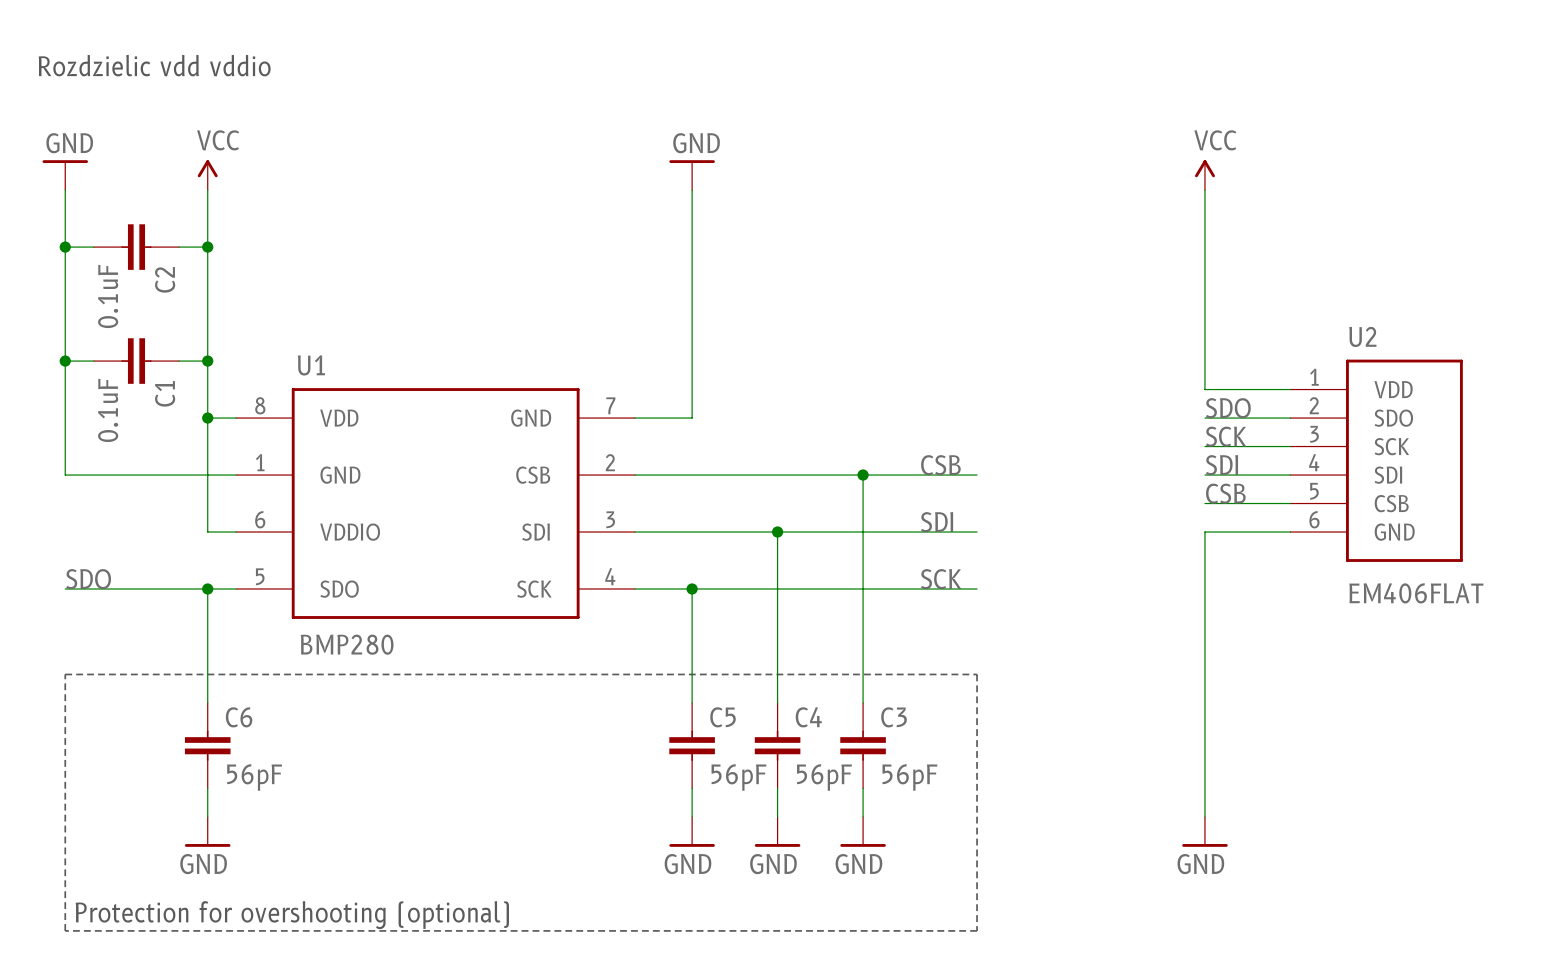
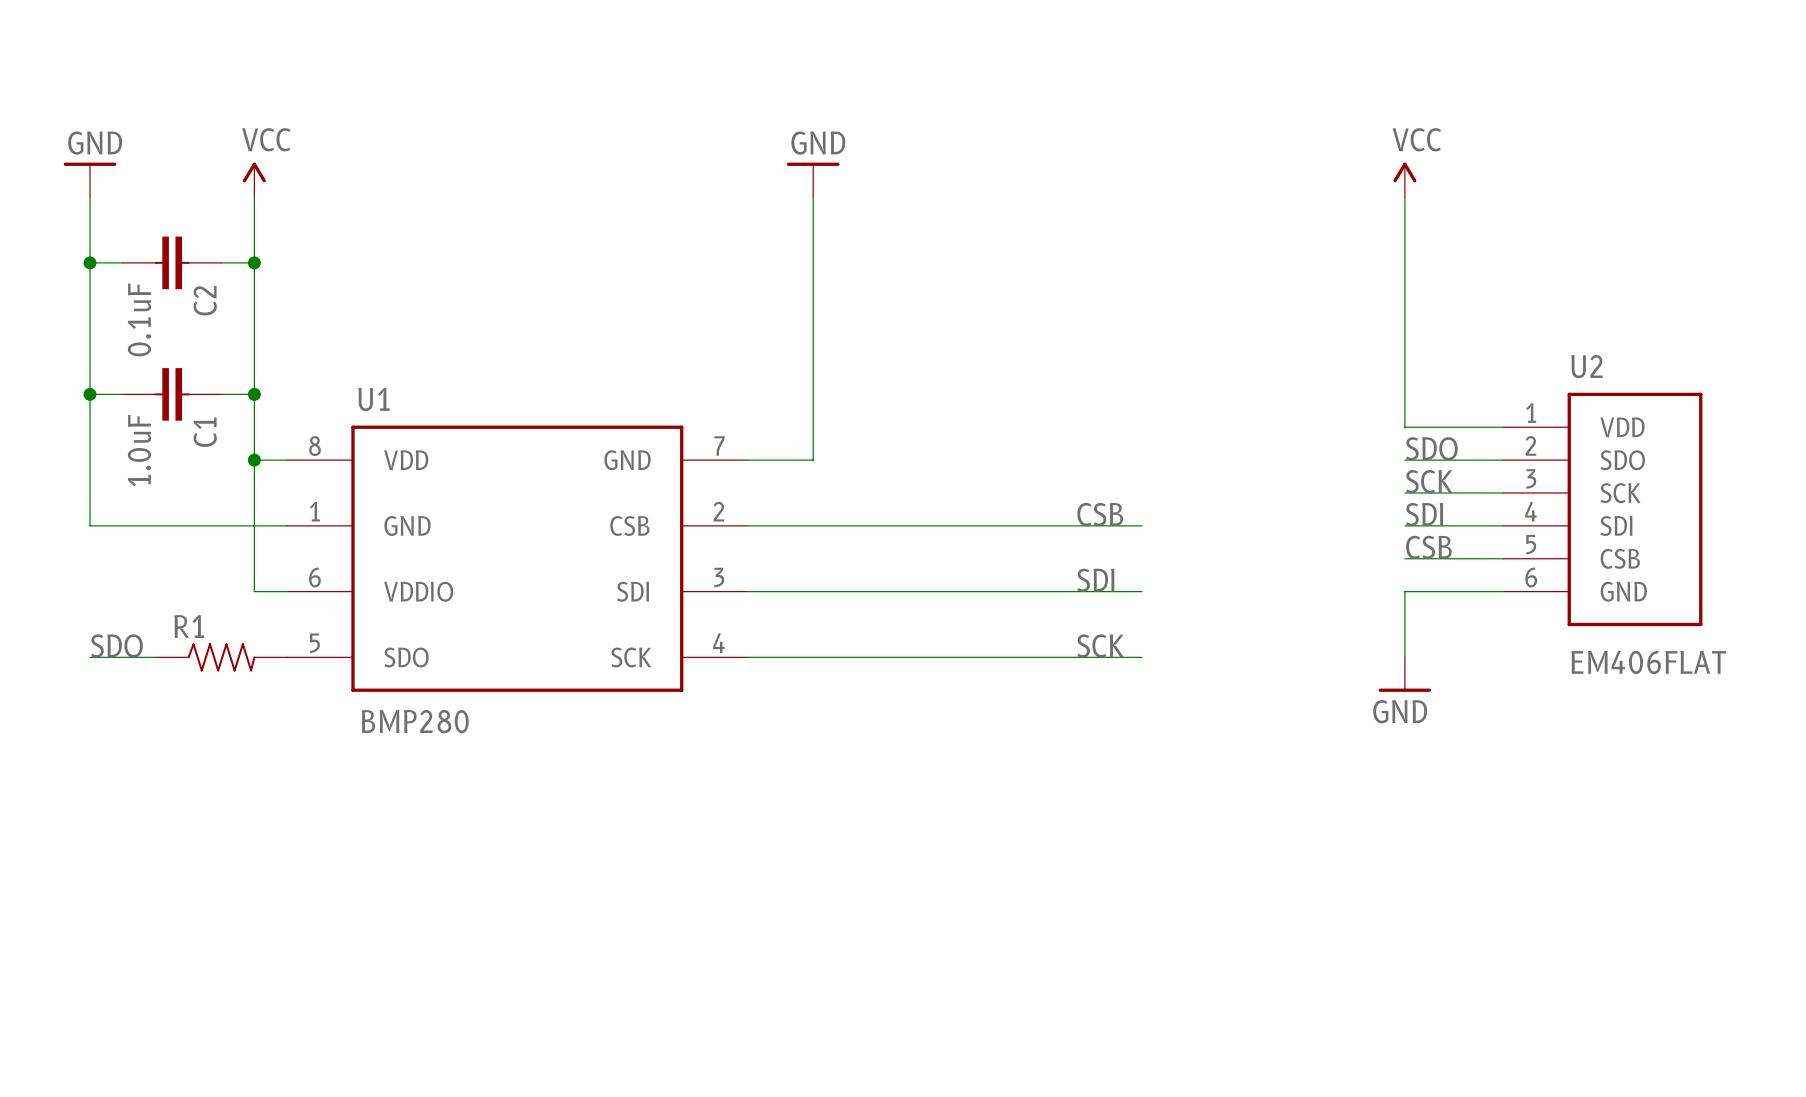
text: Rozdzielic vdd vddio (154, 65) -> none
C1 value: 0.1uF (108, 410) -> 1.0uF (139, 450)
wire: (863, 475) (863, 702) -> none
junction: (863, 475) -> none
wire: (777, 532) (777, 702) -> none
junction: (777, 532) -> none
R1: none -> (221, 657)
wire: (207, 588) (207, 702) -> none
junction: (207, 588) -> none
wire: (692, 588) (692, 702) -> none
junction: (692, 588) -> none
wire: (1204, 588) (1204, 816) -> none
power symbol: none -> GND (1404, 674)
line: (65, 674) (977, 674) (977, 930) (65, 930) (65, 674) -> none
C6: 56pF (207, 745) -> none
C5: 56pF (692, 745) -> none
C4: 56pF (777, 745) -> none
C3: 56pF (863, 745) -> none
wire: (207, 788) (207, 816) -> none
wire: (692, 788) (692, 816) -> none
wire: (777, 788) (777, 816) -> none
wire: (863, 788) (863, 816) -> none
power symbol: GND (207, 831) -> none
power symbol: GND (692, 831) -> none
power symbol: GND (777, 831) -> none
power symbol: GND (863, 831) -> none
power symbol: GND (1204, 831) -> none
text: Protection for overshooting (optional) (292, 915) -> none

